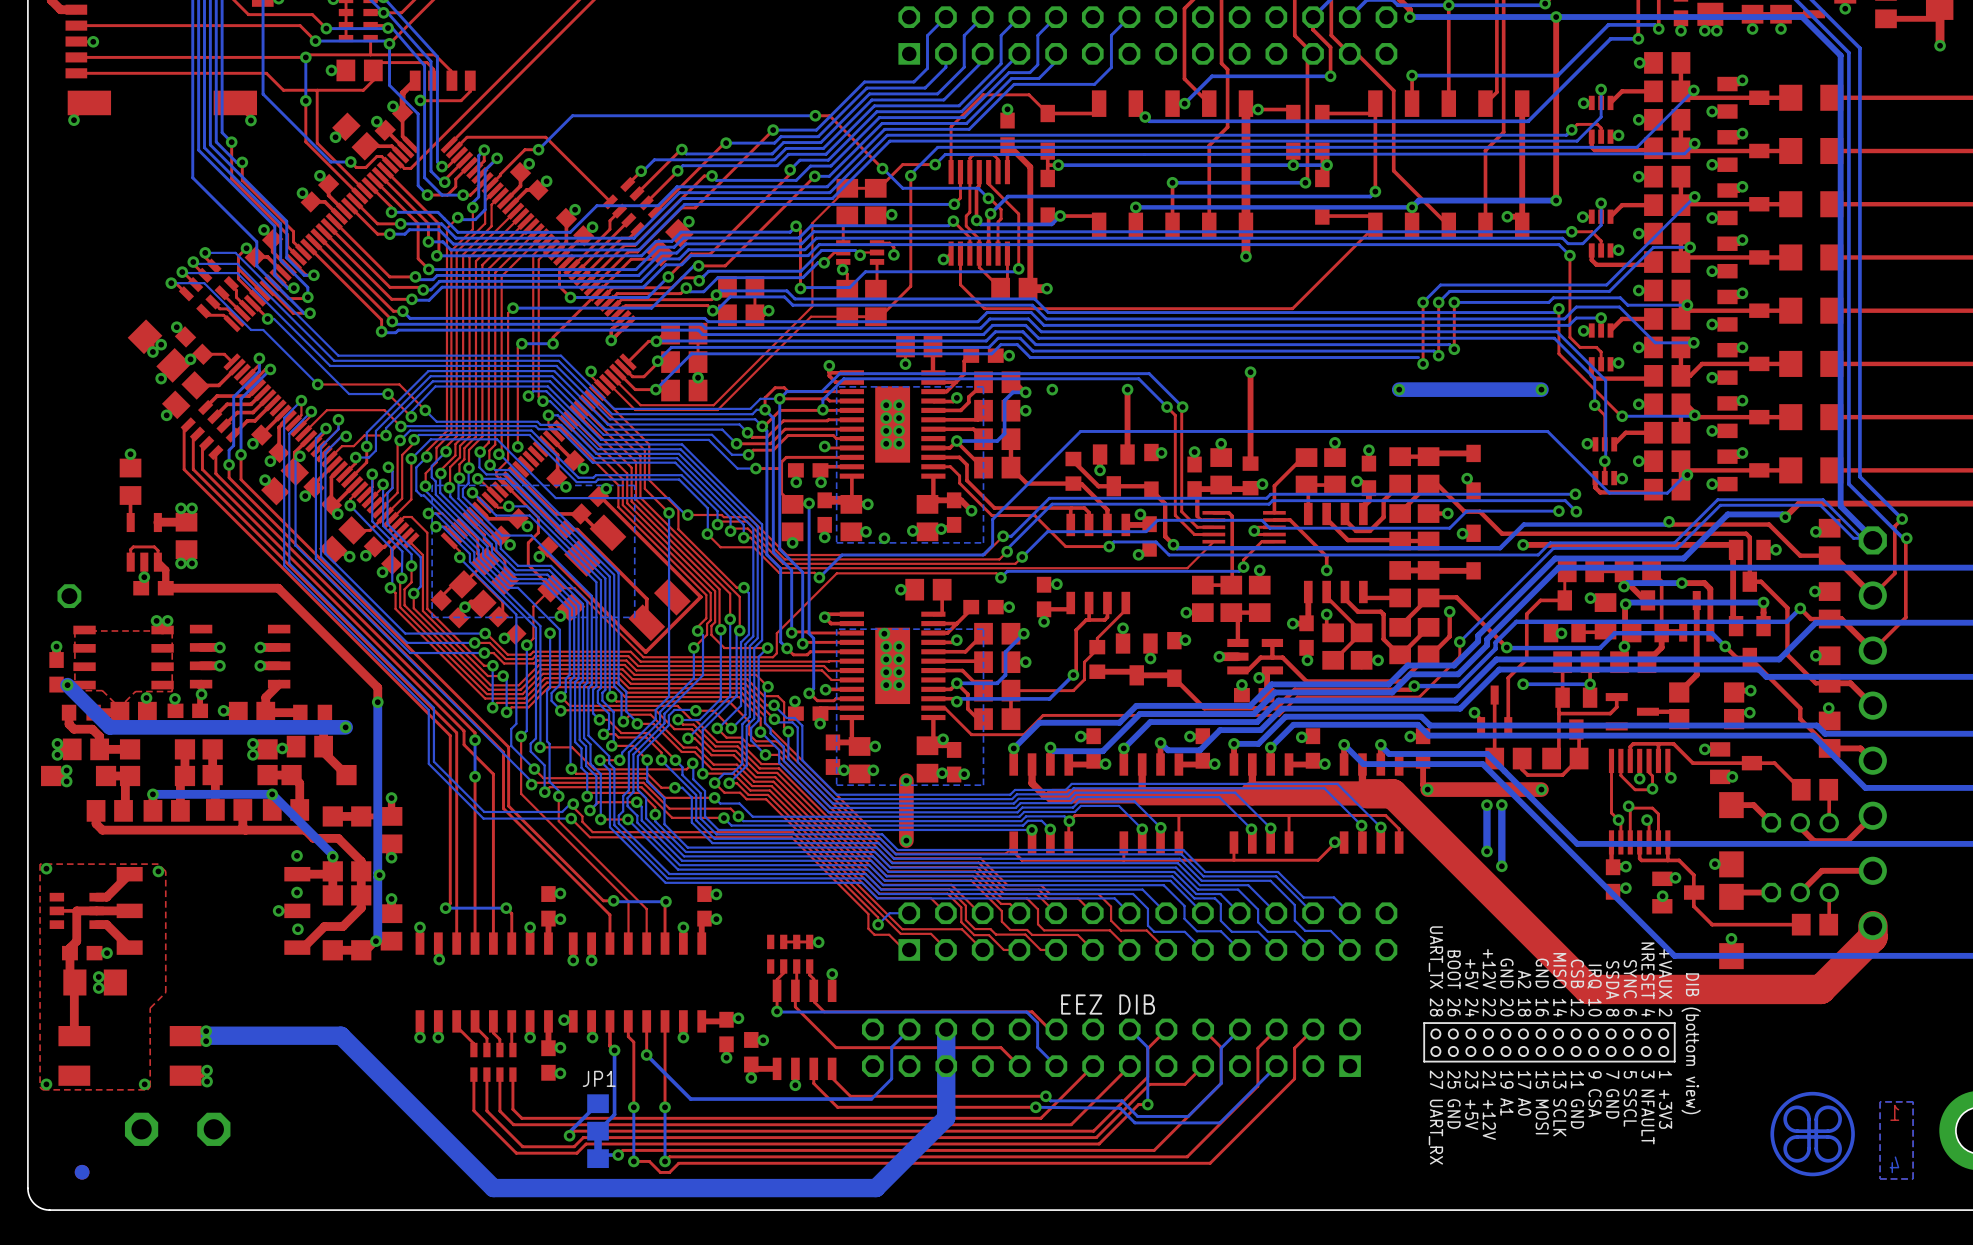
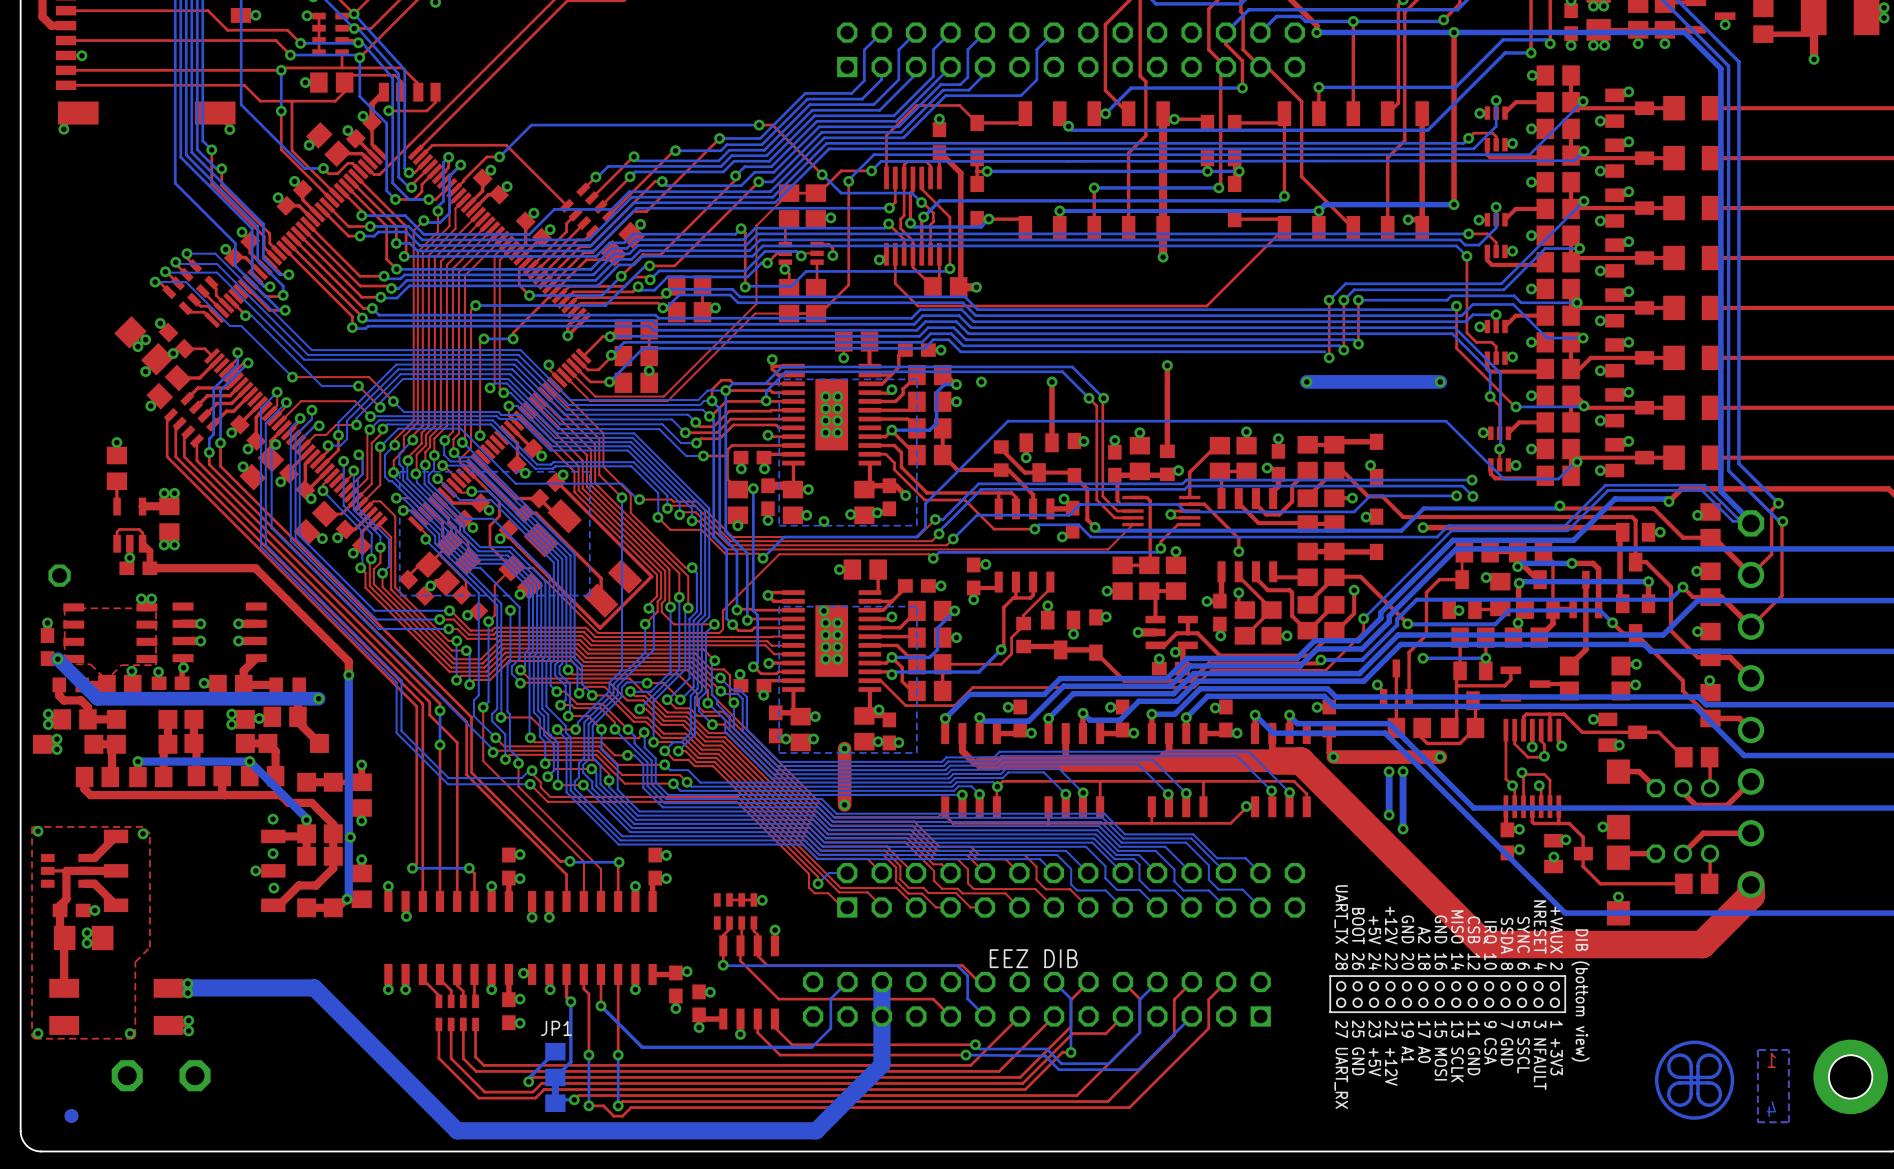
top track: (246, 248) (238, 256) (238, 278) (257, 298) -> none
top track: (238, 268) (262, 292) -> none

